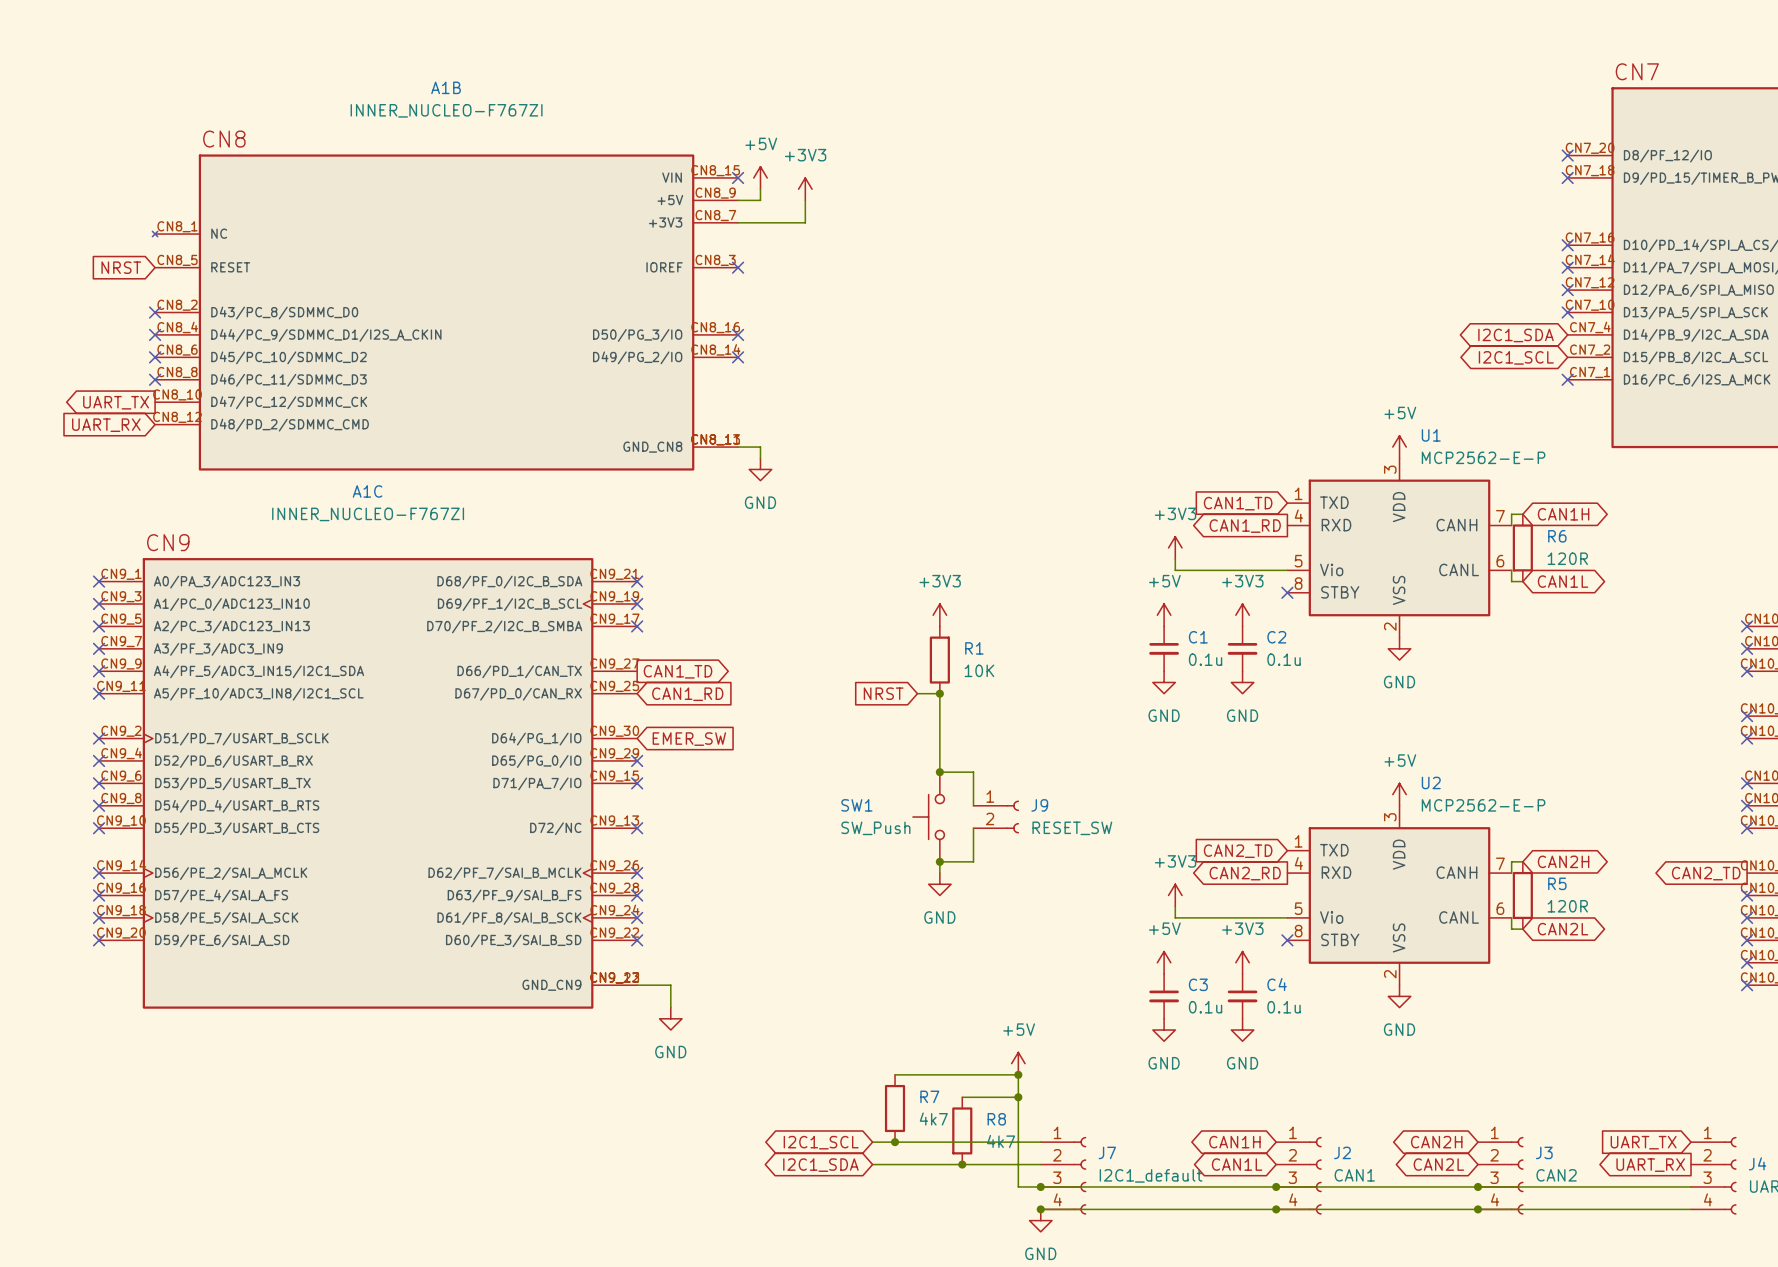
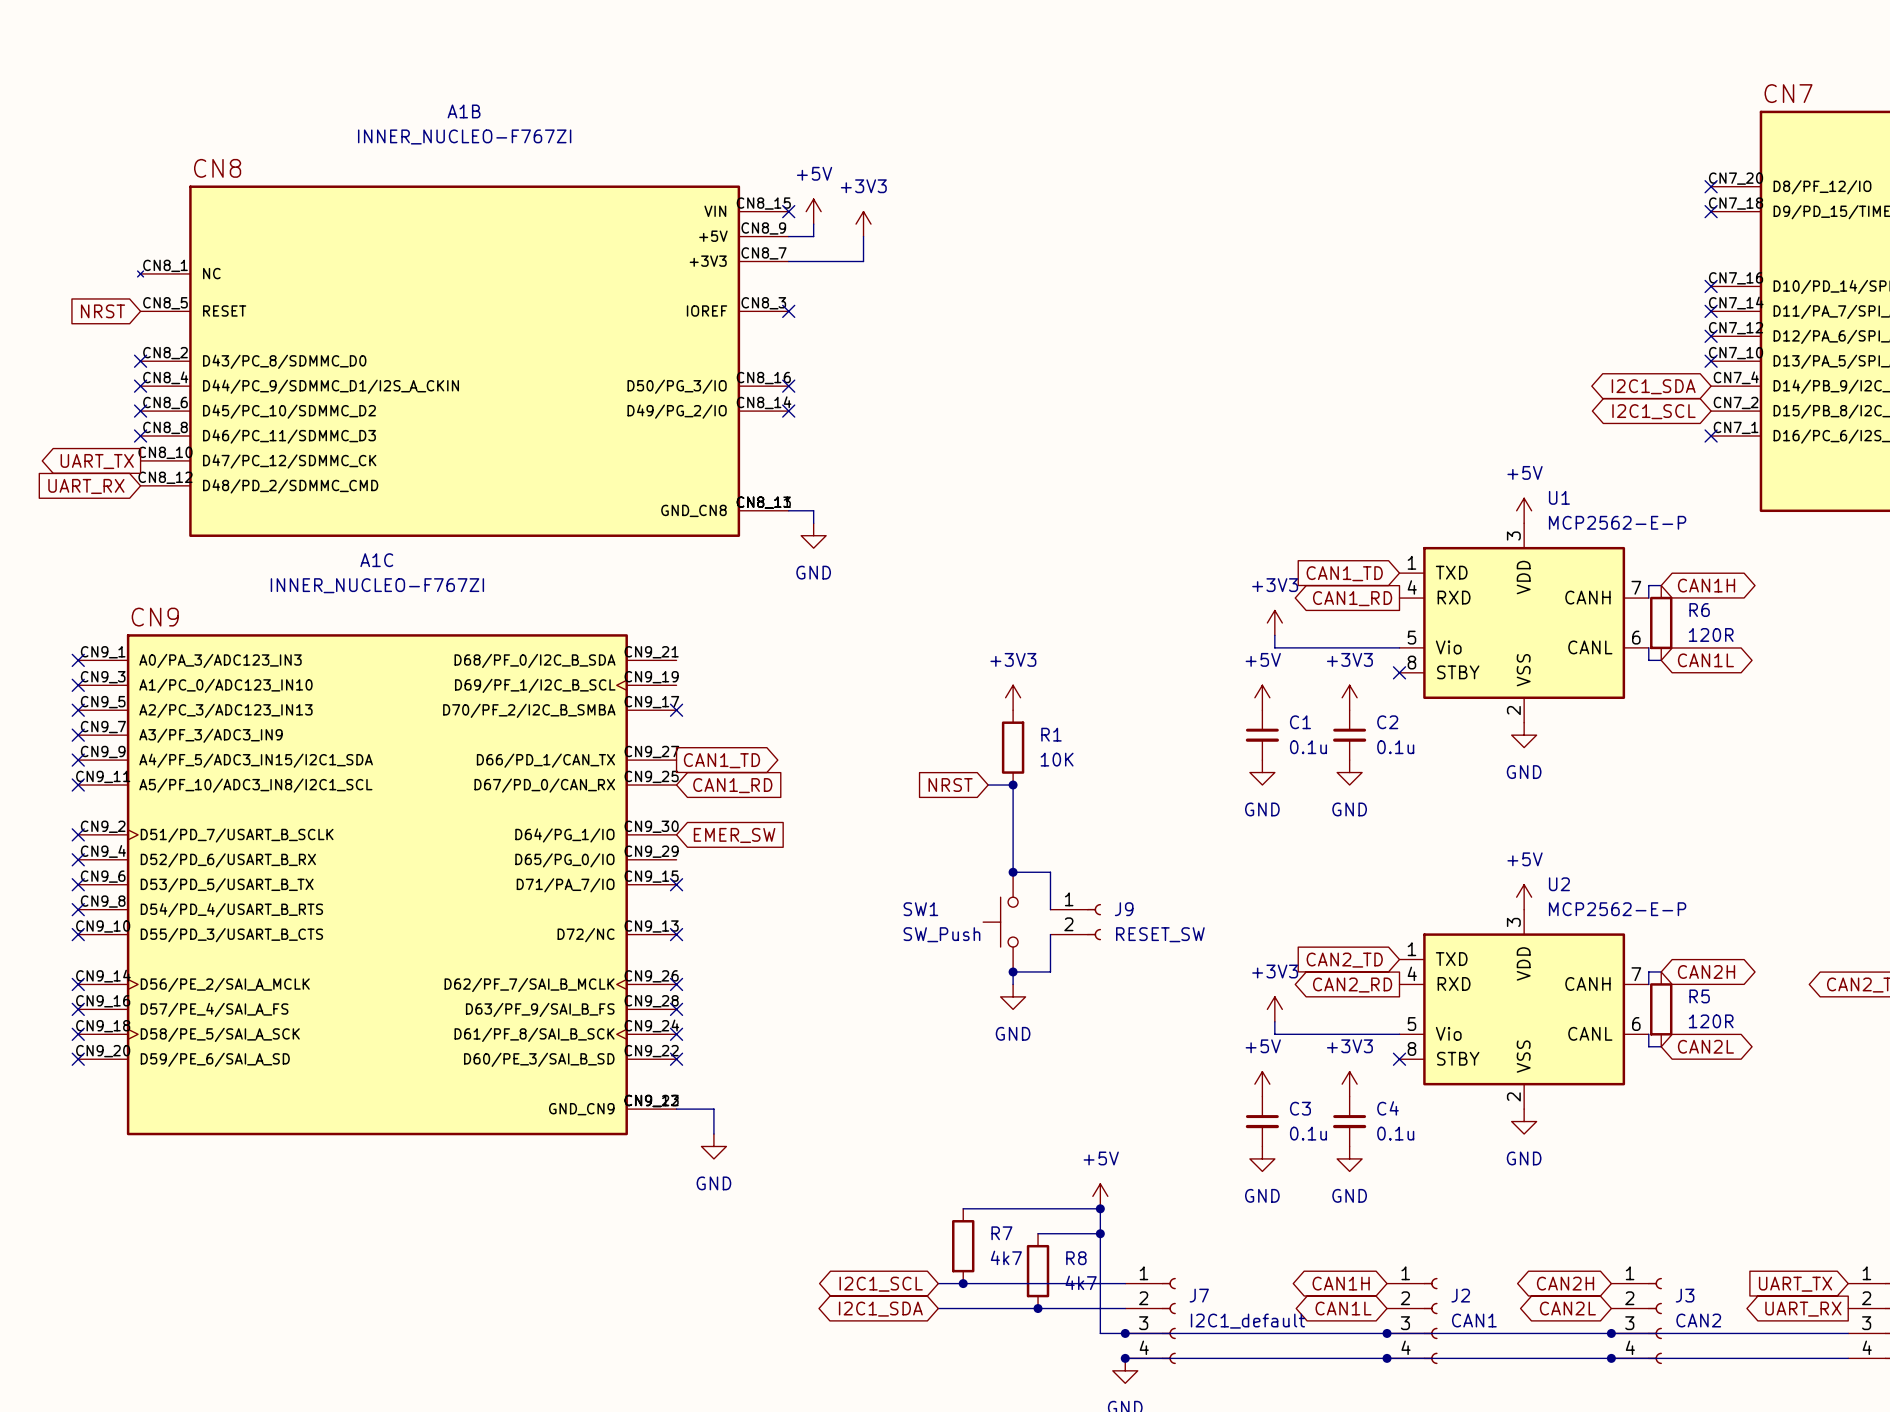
no-connect mark: (637, 581) -> none
no-connect mark: (637, 604) -> none
no-connect mark: (637, 760) -> none

